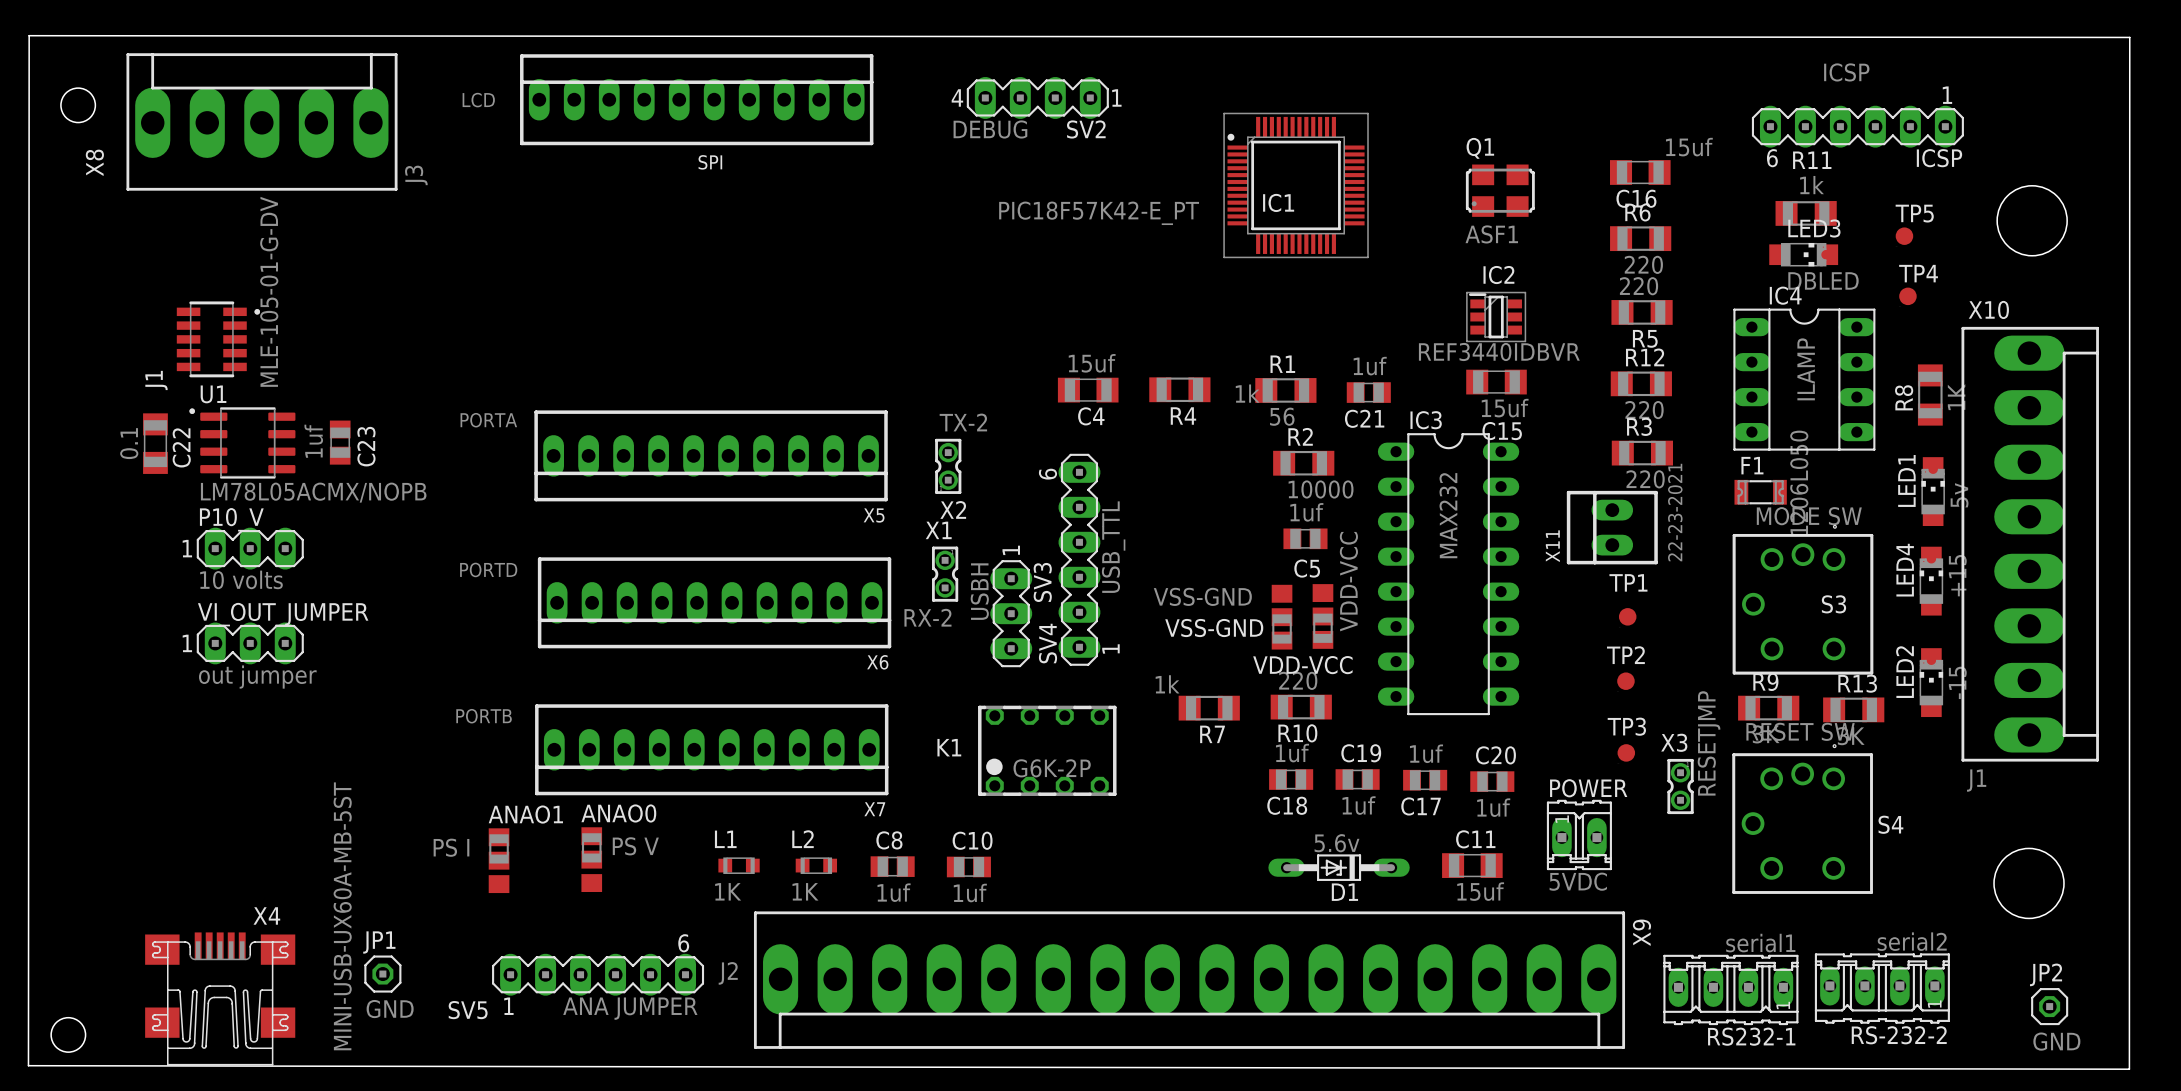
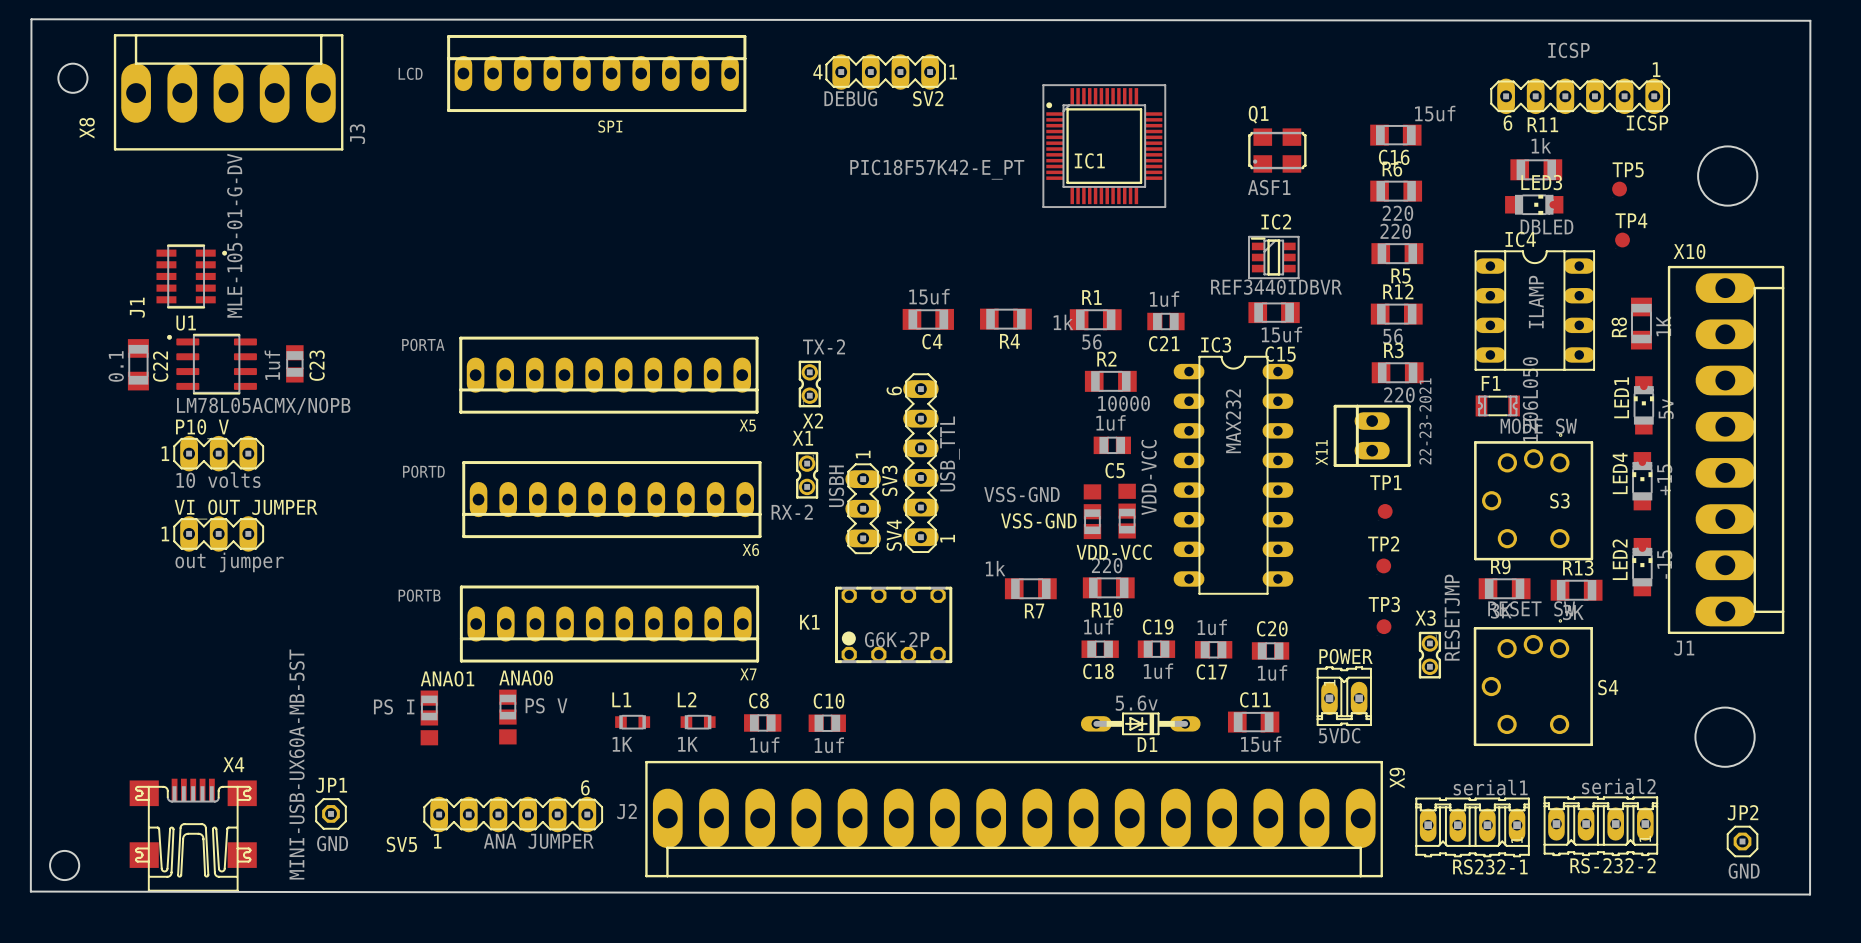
R12 value: 220 (1644, 410) -> 56 (1392, 336)

